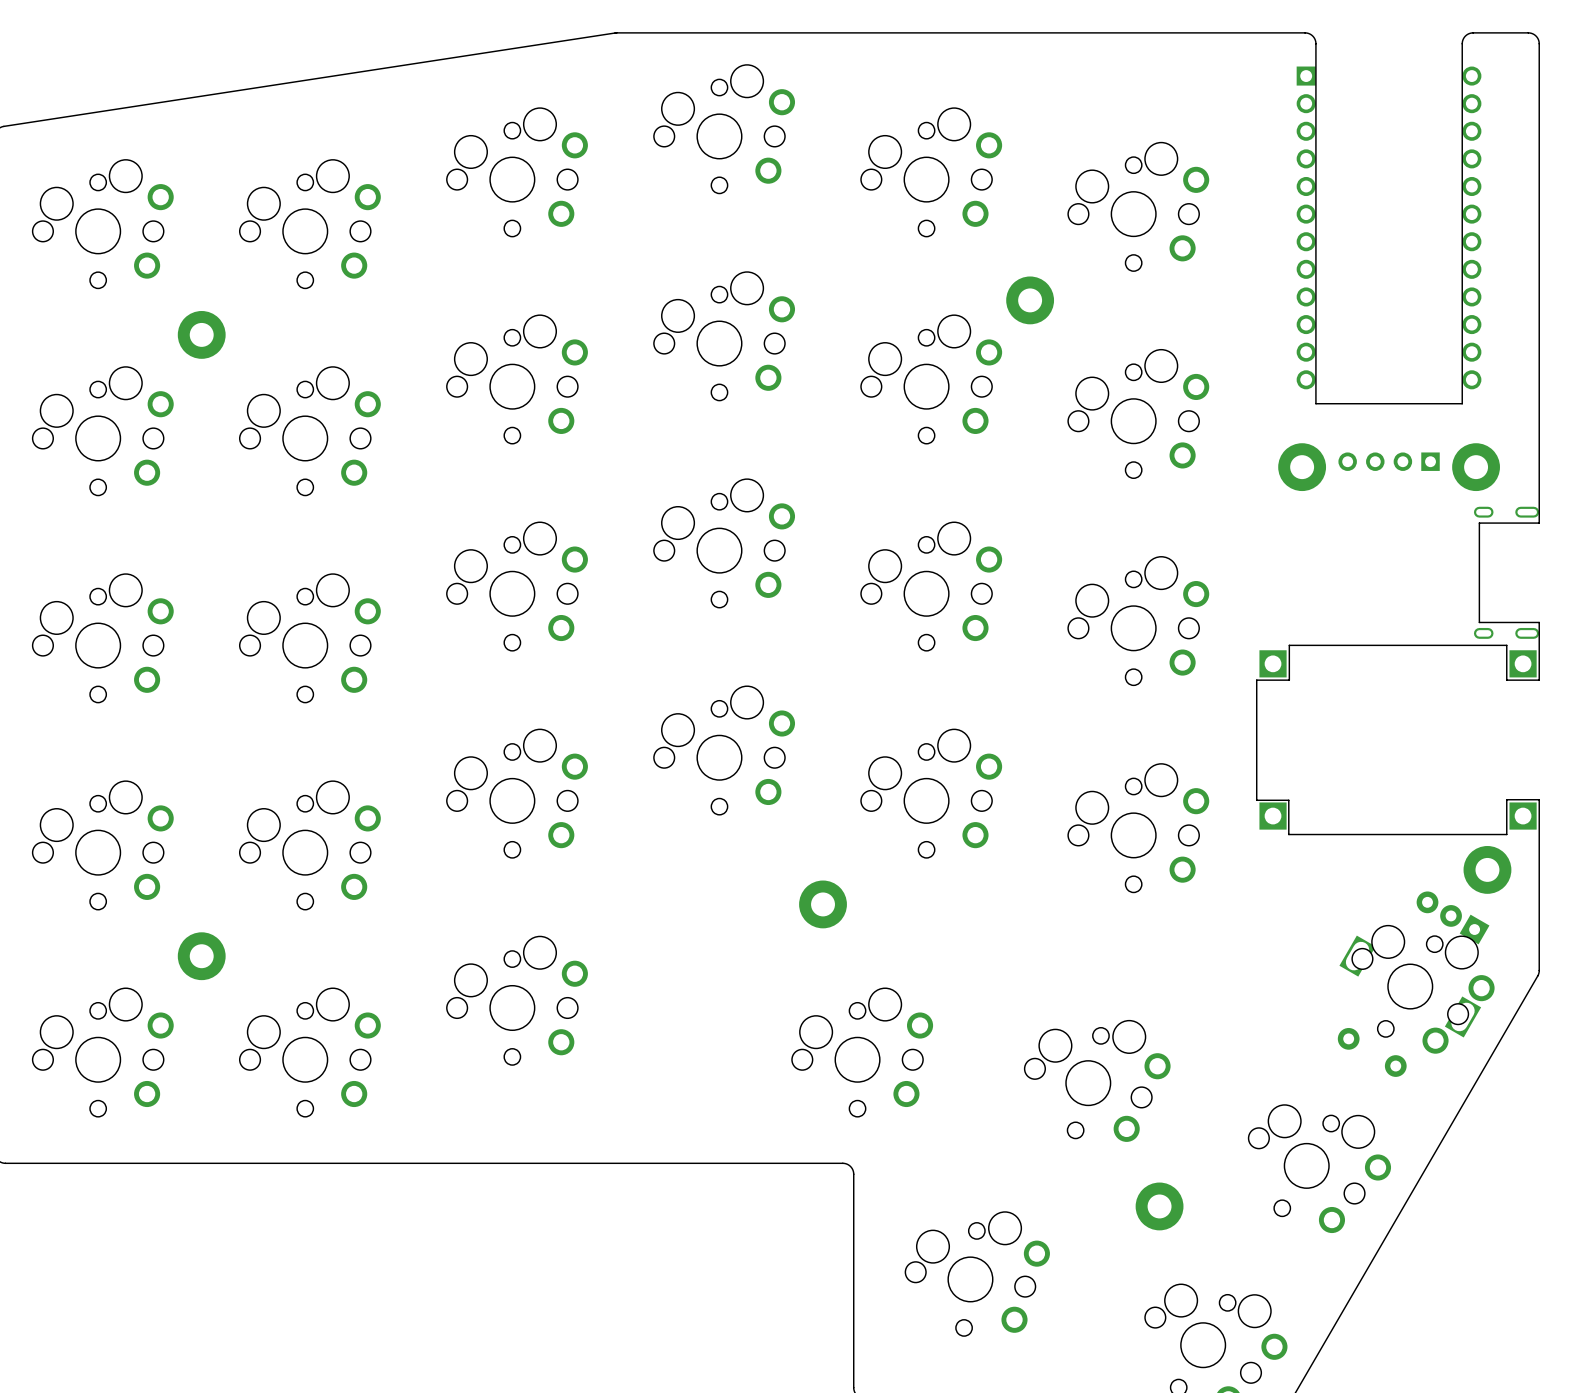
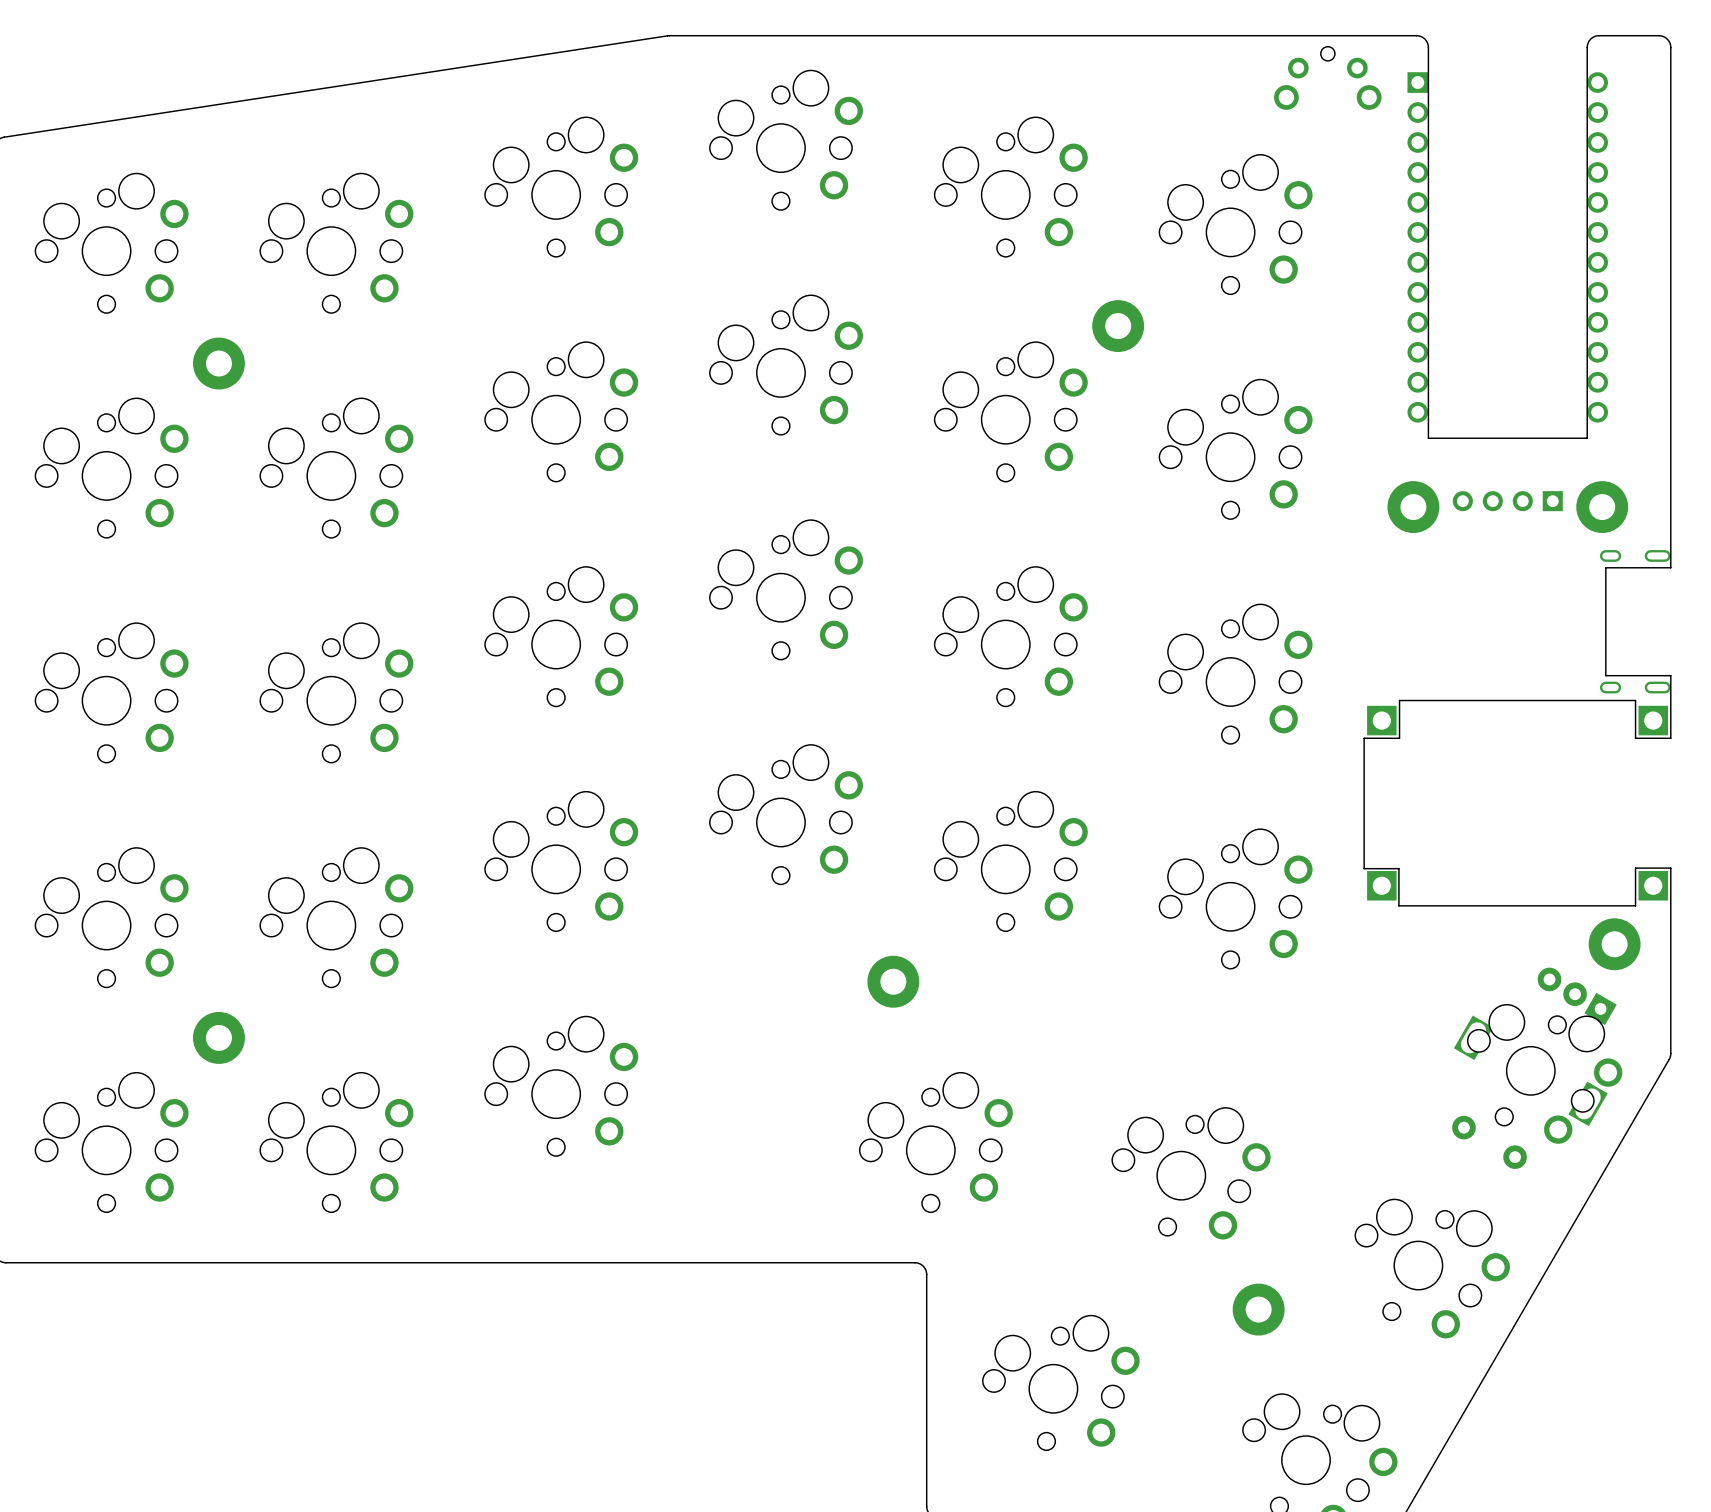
part: none -> (1327, 78)

